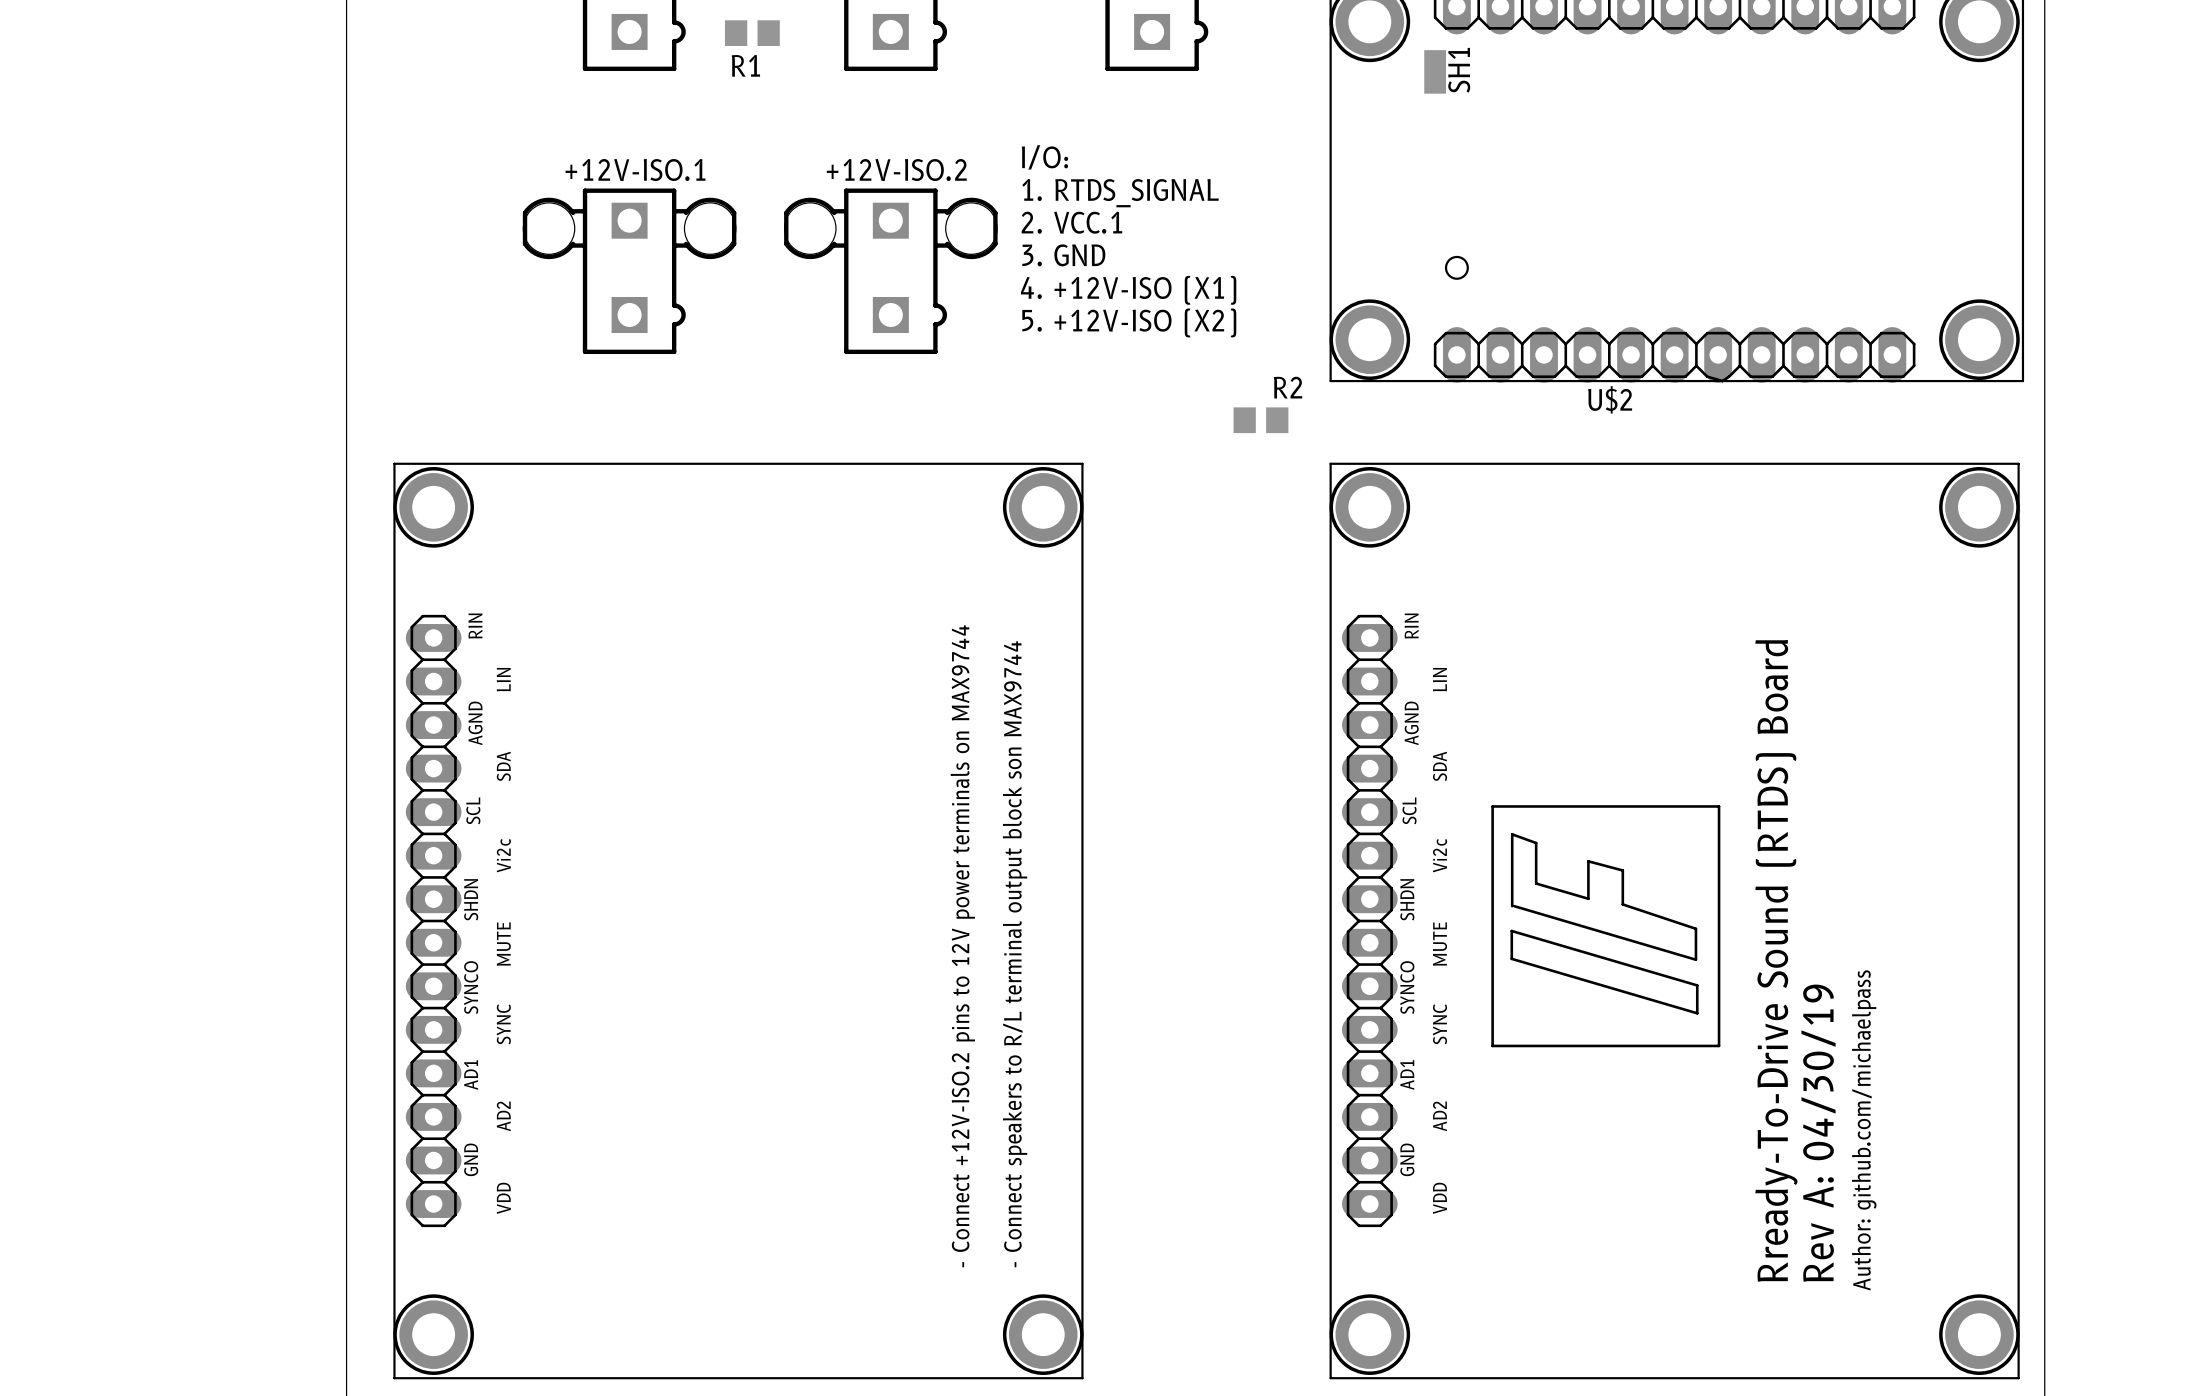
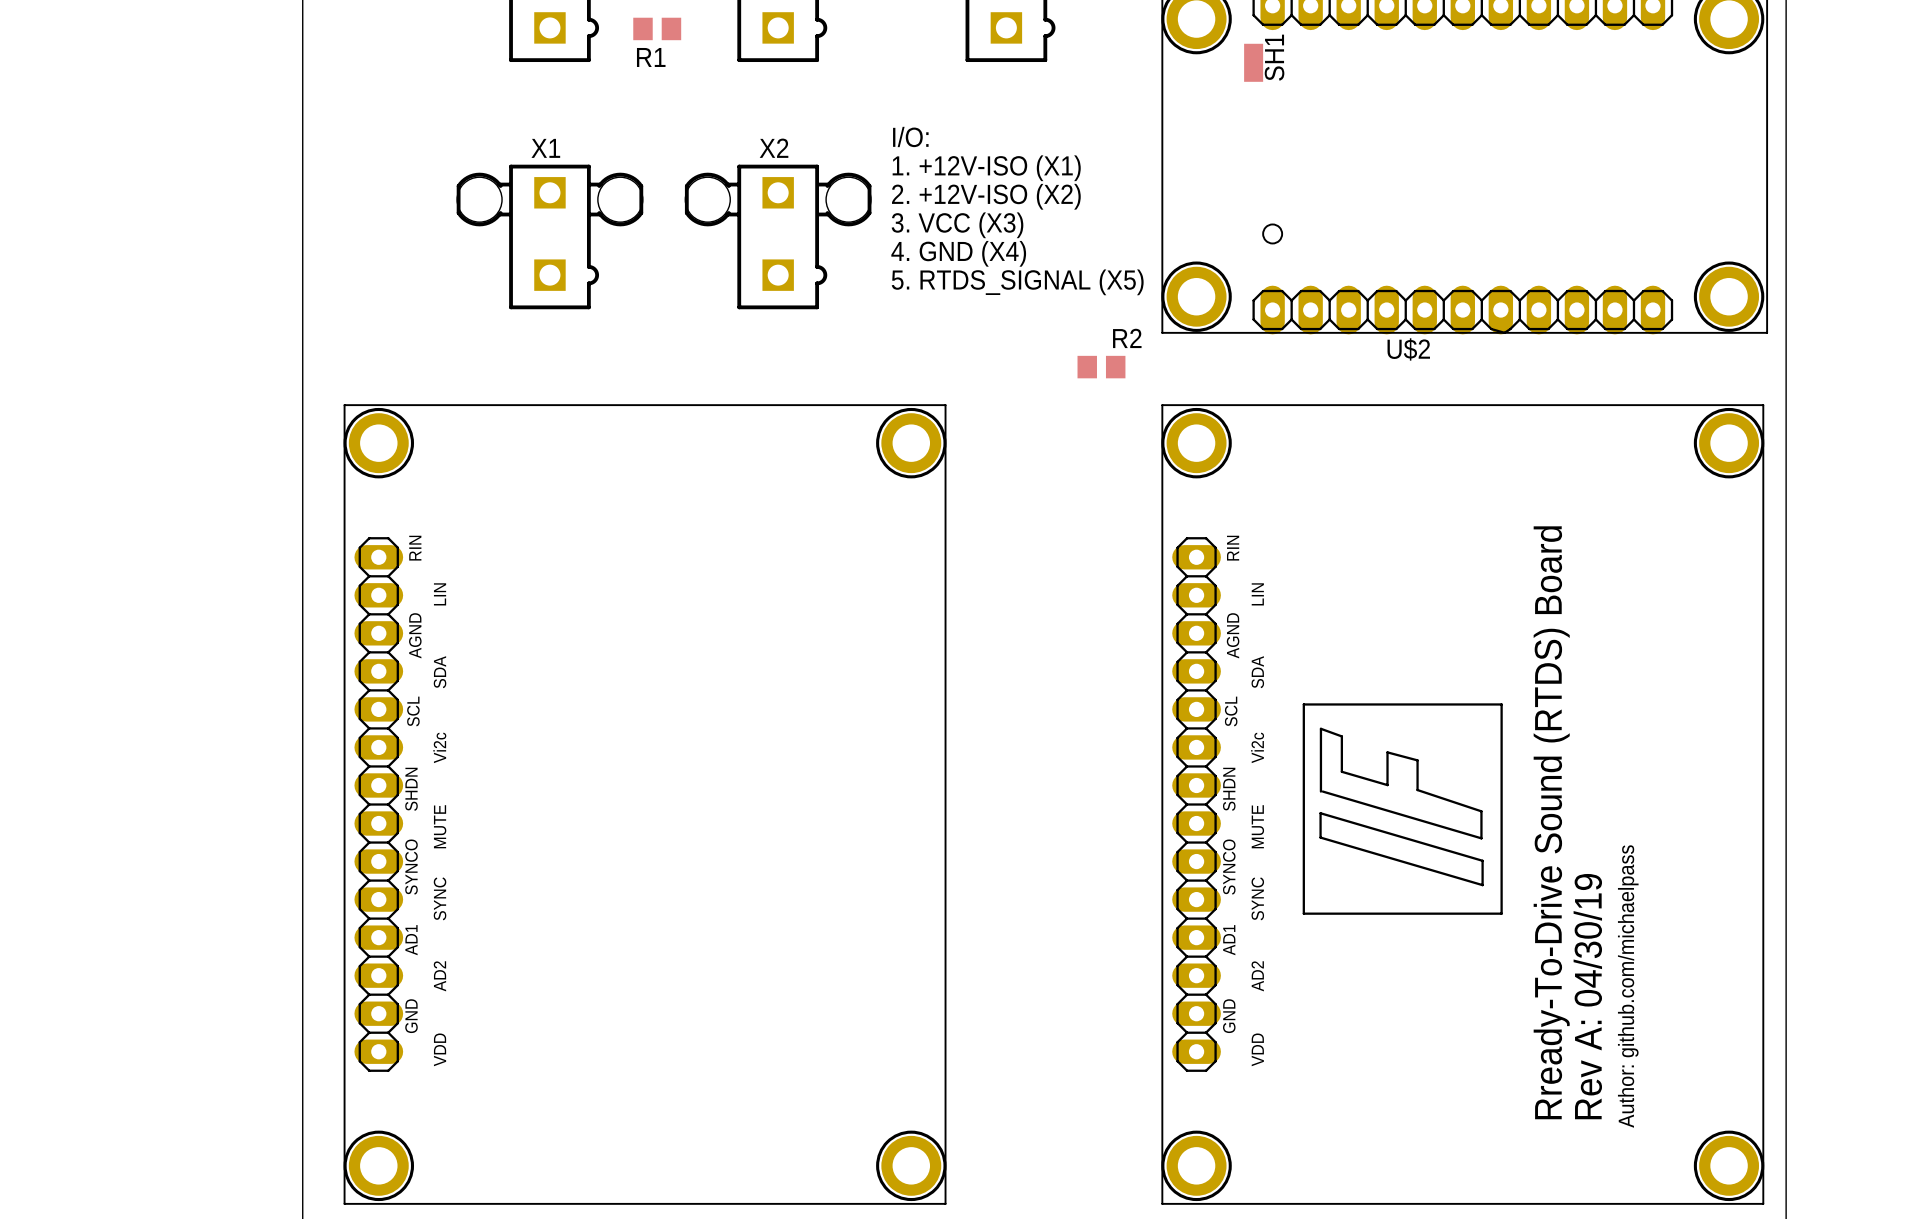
+12V-ISO.1 name: +12V-ISO.1 (635, 170) -> X1 (545, 148)
+12V-ISO.2 name: +12V-ISO.2 (896, 170) -> X2 (774, 148)
text: 1. RTDS_SIGNAL (1120, 193) -> 1. +12V-ISO (X1) (986, 168)
text: 2. VCC.1 (1071, 222) -> 2. +12V-ISO (X2) (986, 196)
text: 3. GND (1063, 255) -> 3. VCC (X3) (957, 225)
text: 4. +12V-ISO (X1) (1128, 290) -> 4. GND (X4) (958, 253)
text: 5. +12V-ISO (X2) (1129, 322) -> 5. RTDS_SIGNAL (X5) (1017, 282)
text: - Connect +12V-ISO.2 pins to 12V power terminals on MAX9744 (962, 946) -> none
text: - Connect speakers to R/L terminal output block son MAX9744 (1015, 954) -> none

